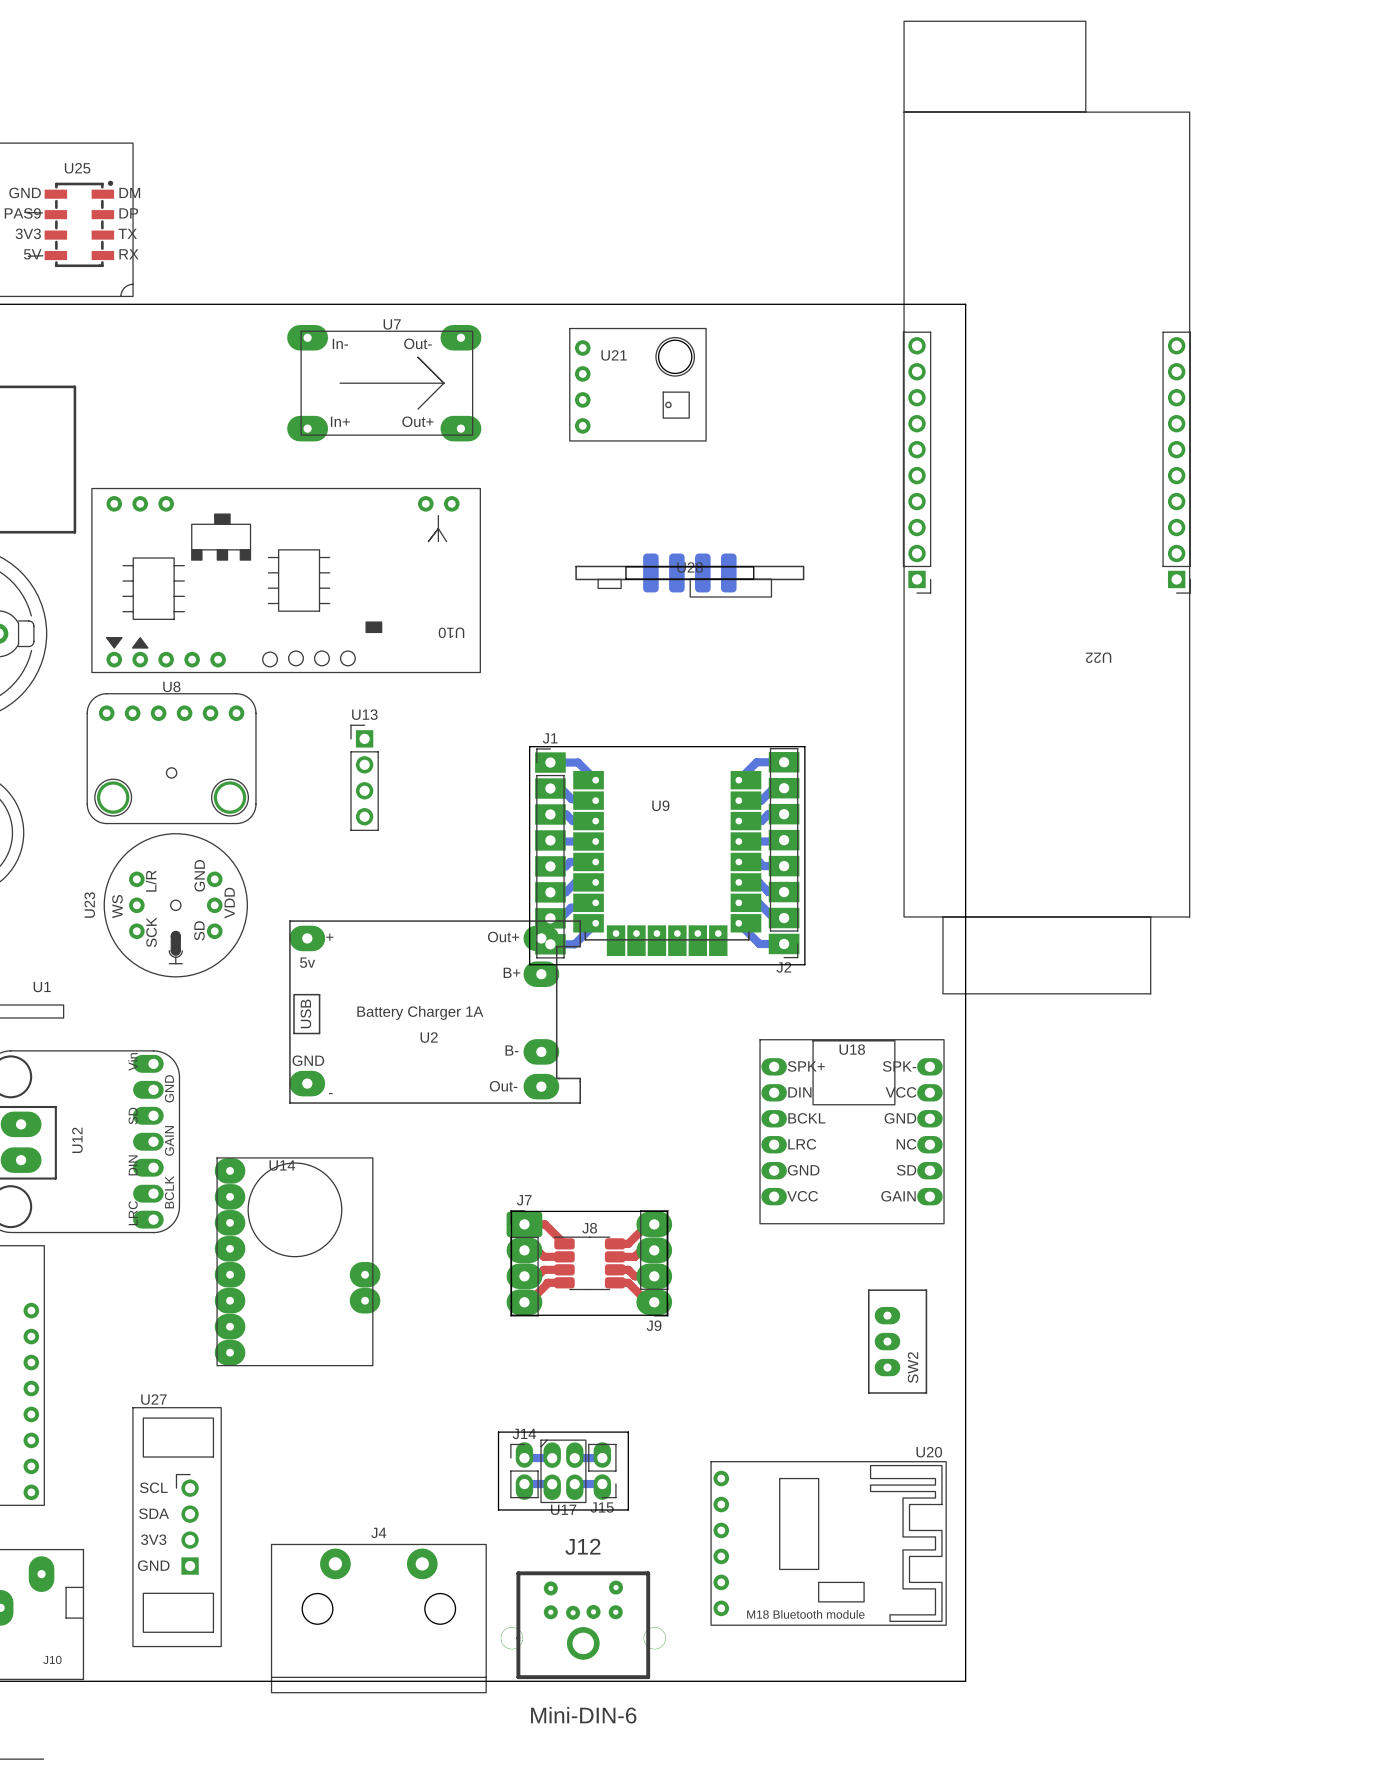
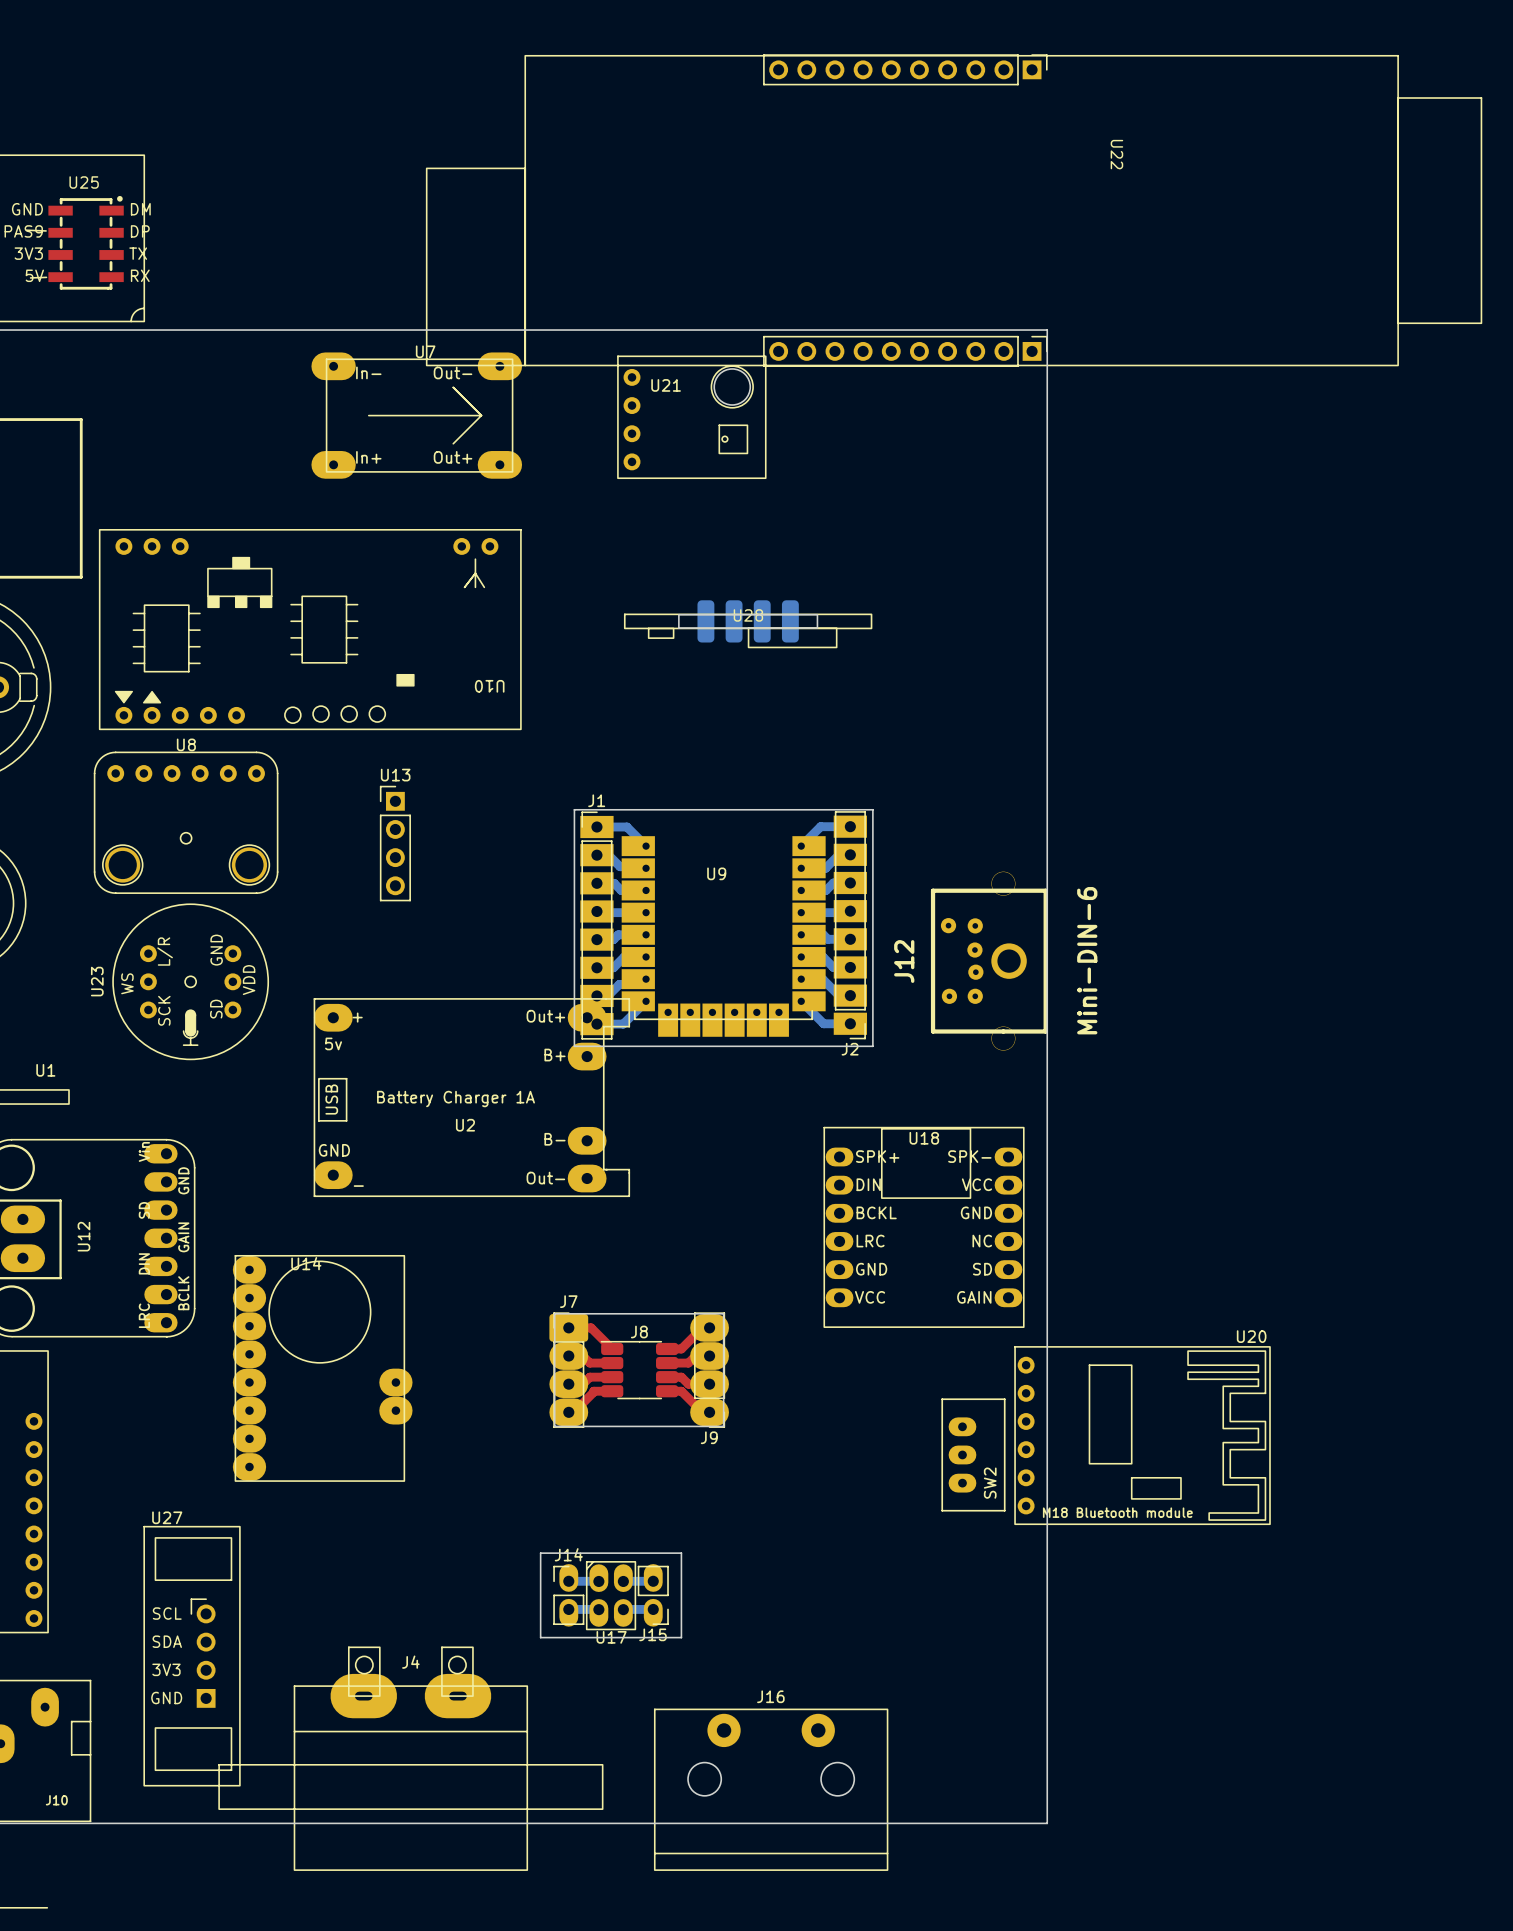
U22 rotation: 0° (1046, 507) -> 90° counterclockwise (954, 210)
J4 footprint: [270, 1543, 487, 1694] -> [218, 1646, 604, 1871]
U20 position: (828, 1543) -> (1142, 1435)
J12 rotation: 0° (583, 1625) -> 90° counterclockwise (989, 961)
J12 position: (583, 1625) -> (989, 961)
J16: none -> (771, 1789)

